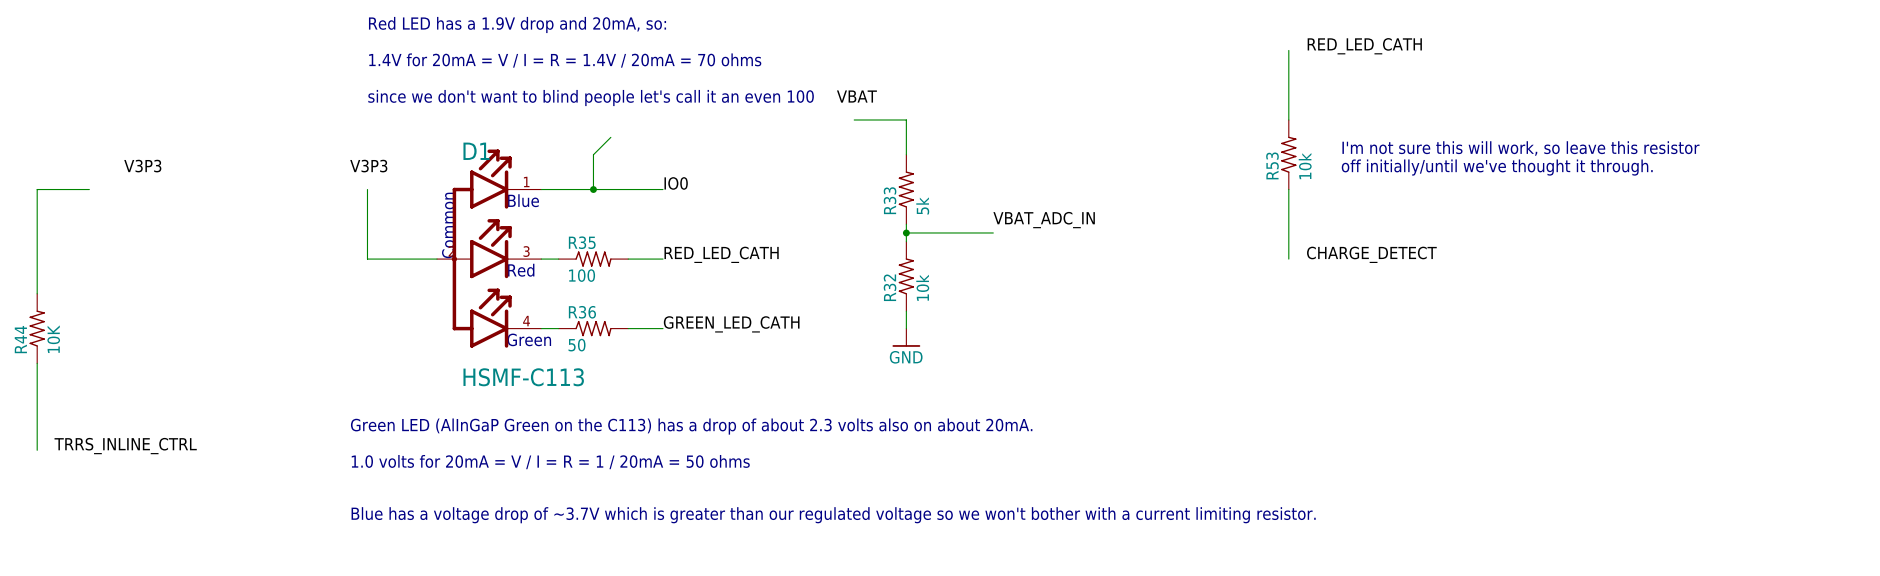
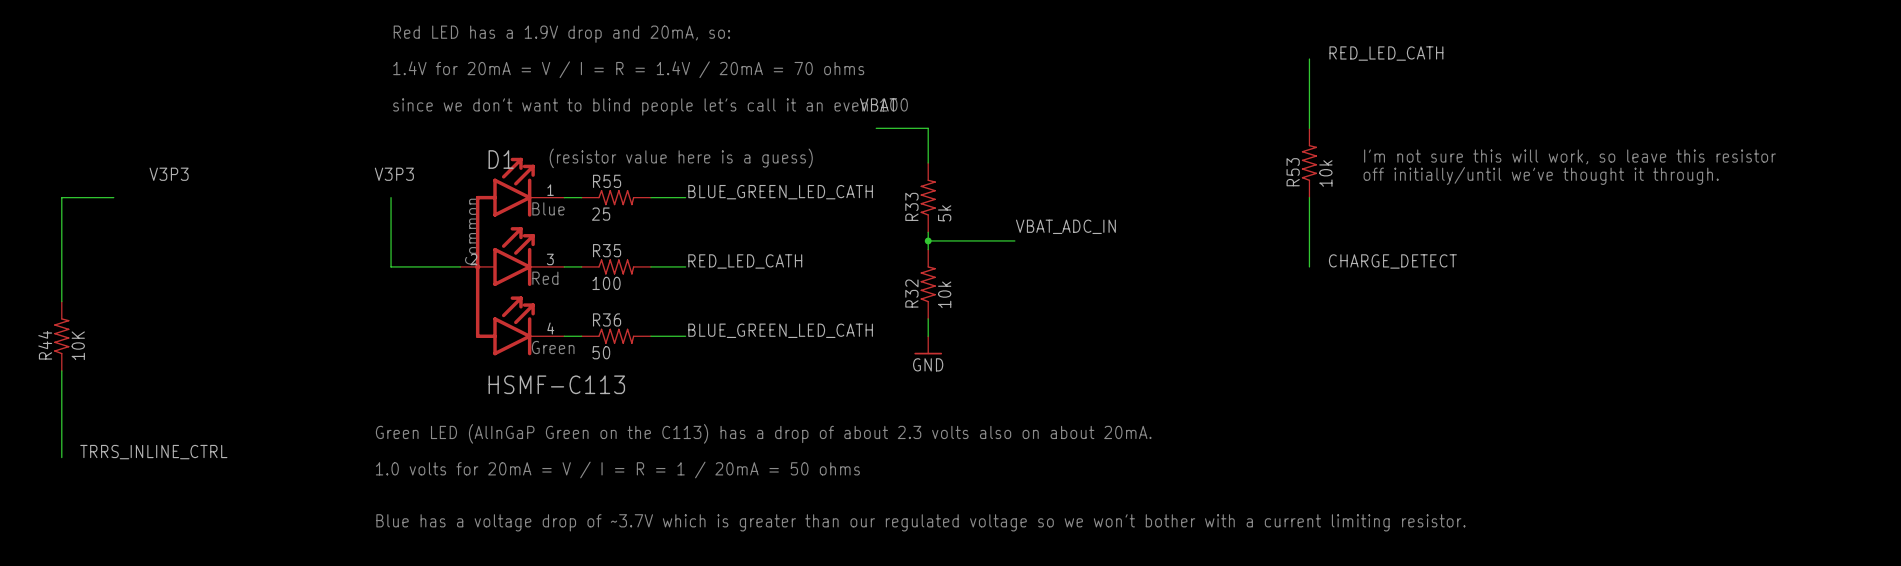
wire: (610, 137) (593, 154) (593, 189) -> none
text: none -> (resistor value here is a guess) (681, 158)
label: IO0 (676, 183) -> BLUE_GREEN_LED_CATH (780, 192)
junction: (593, 189) -> none
R55: none -> 25 (616, 197)
label: GREEN_LED_CATH (731, 324) -> BLUE_GREEN_LED_CATH (780, 330)

